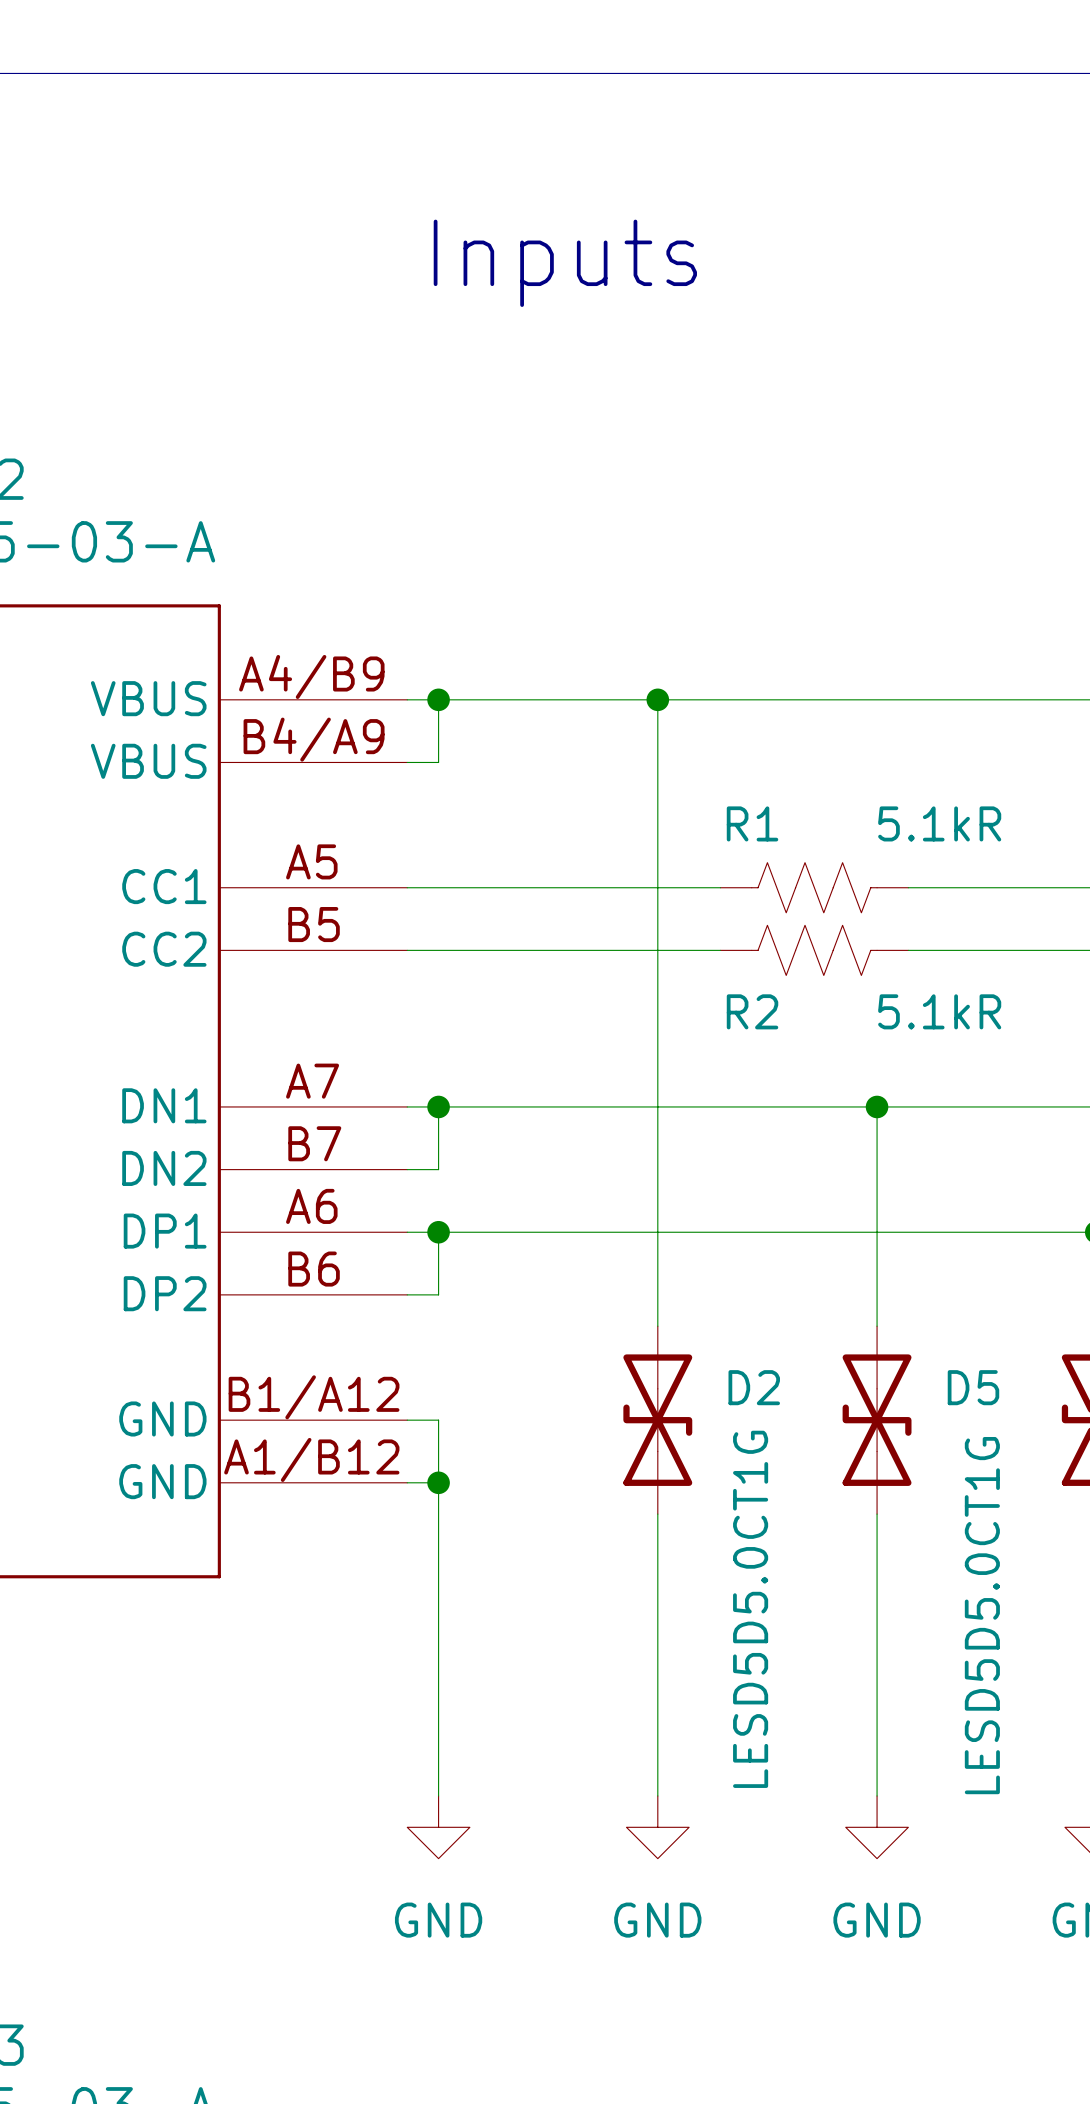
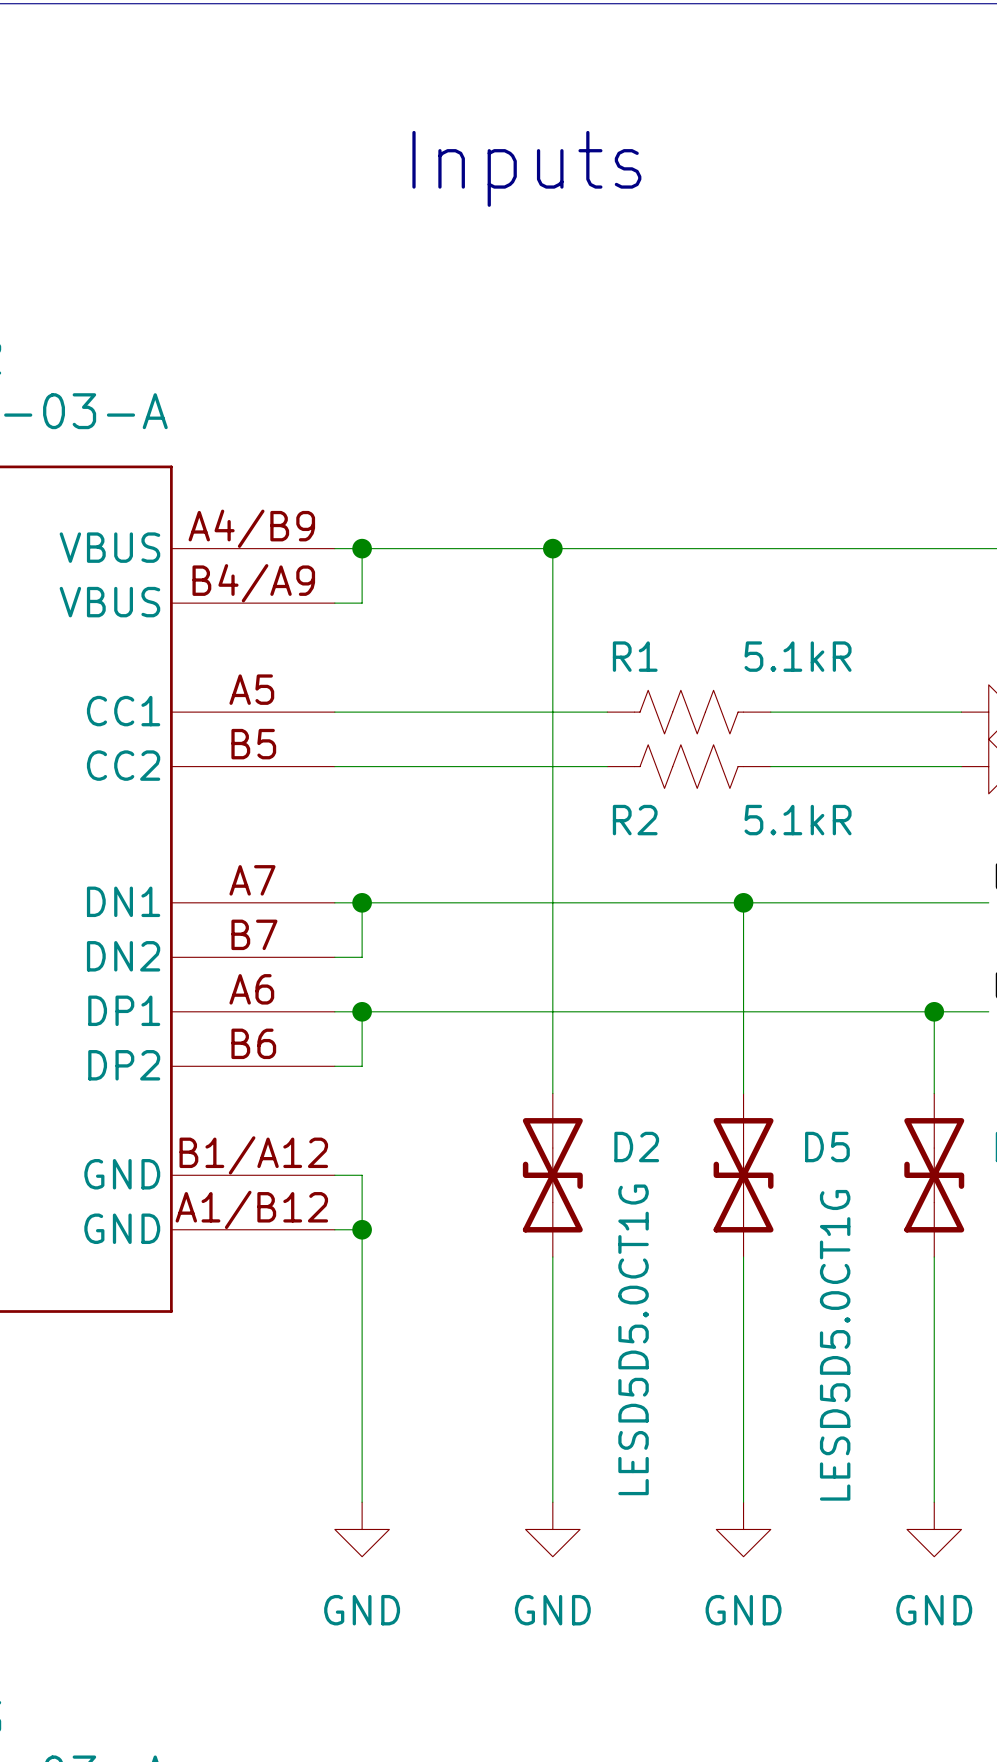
text position: Inputs (565, 263) -> Inputs (526, 168)

